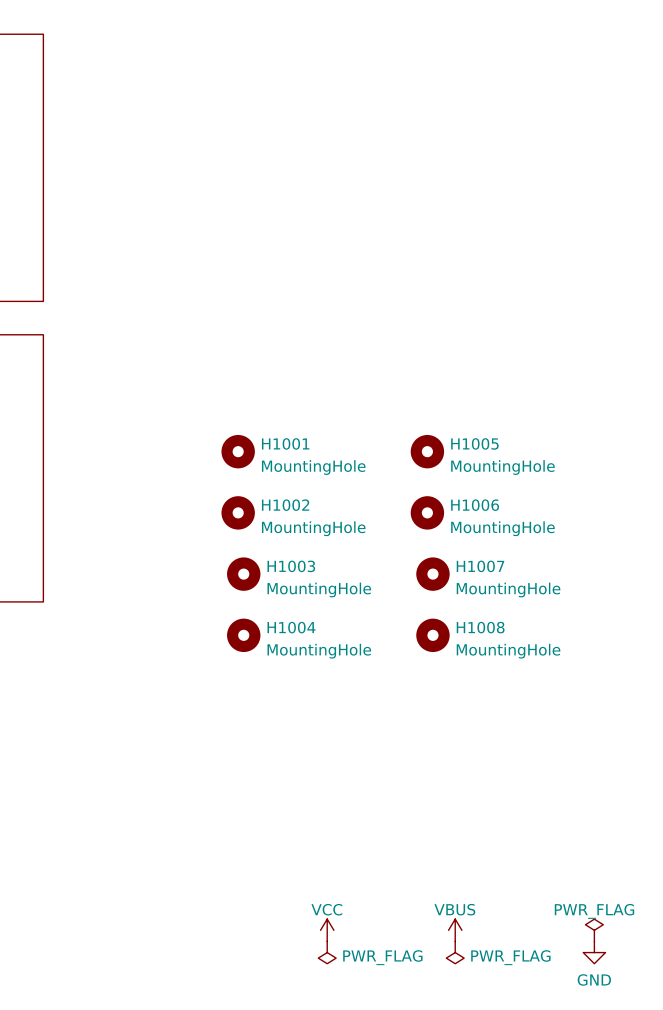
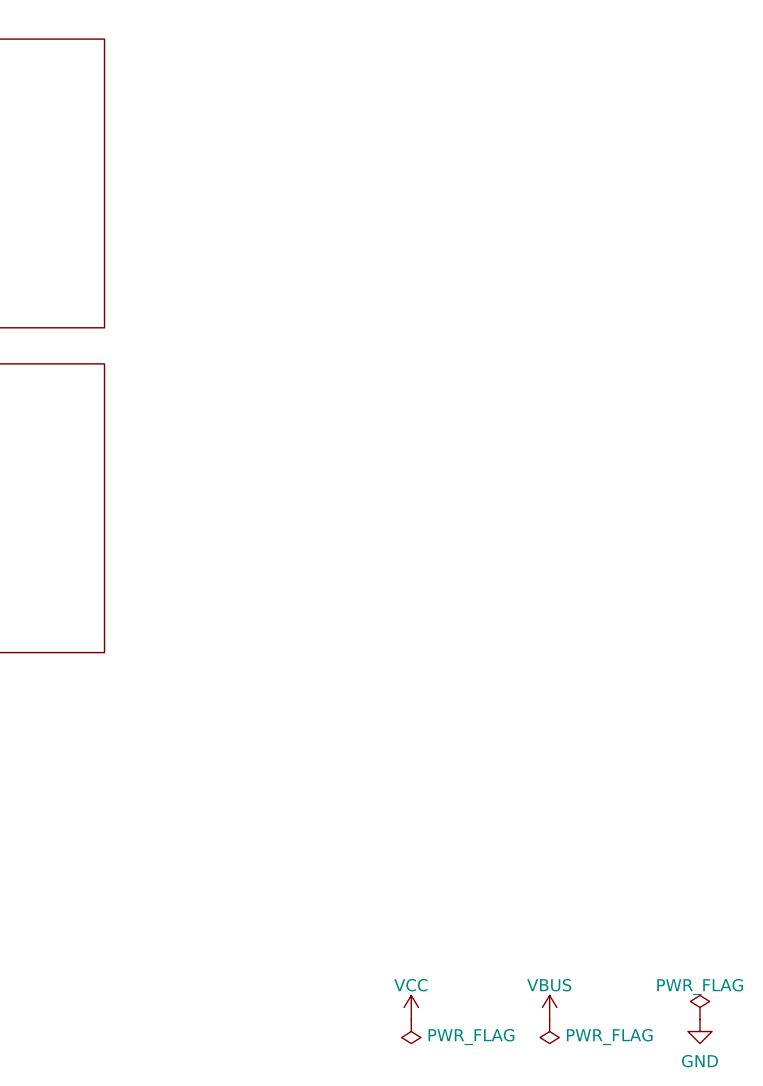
H1001: MountingHole (238, 451) -> none
H1005: MountingHole (427, 451) -> none
H1002: MountingHole (238, 512) -> none
H1006: MountingHole (427, 512) -> none
H1003: MountingHole (243, 574) -> none
H1007: MountingHole (432, 574) -> none
H1004: MountingHole (243, 635) -> none
H1008: MountingHole (432, 635) -> none

